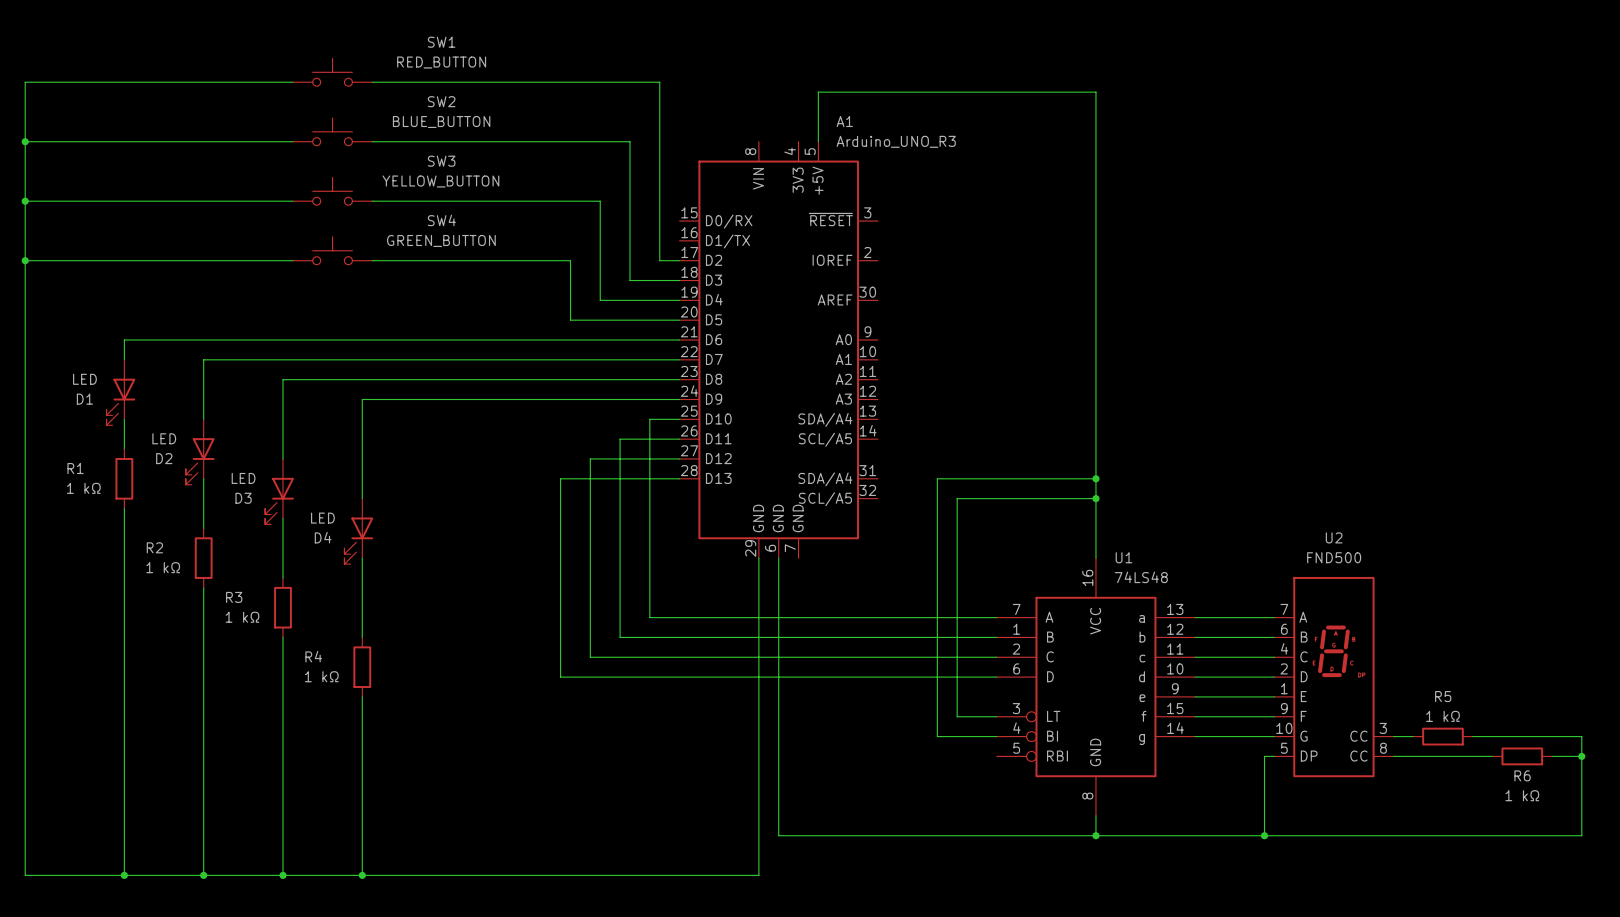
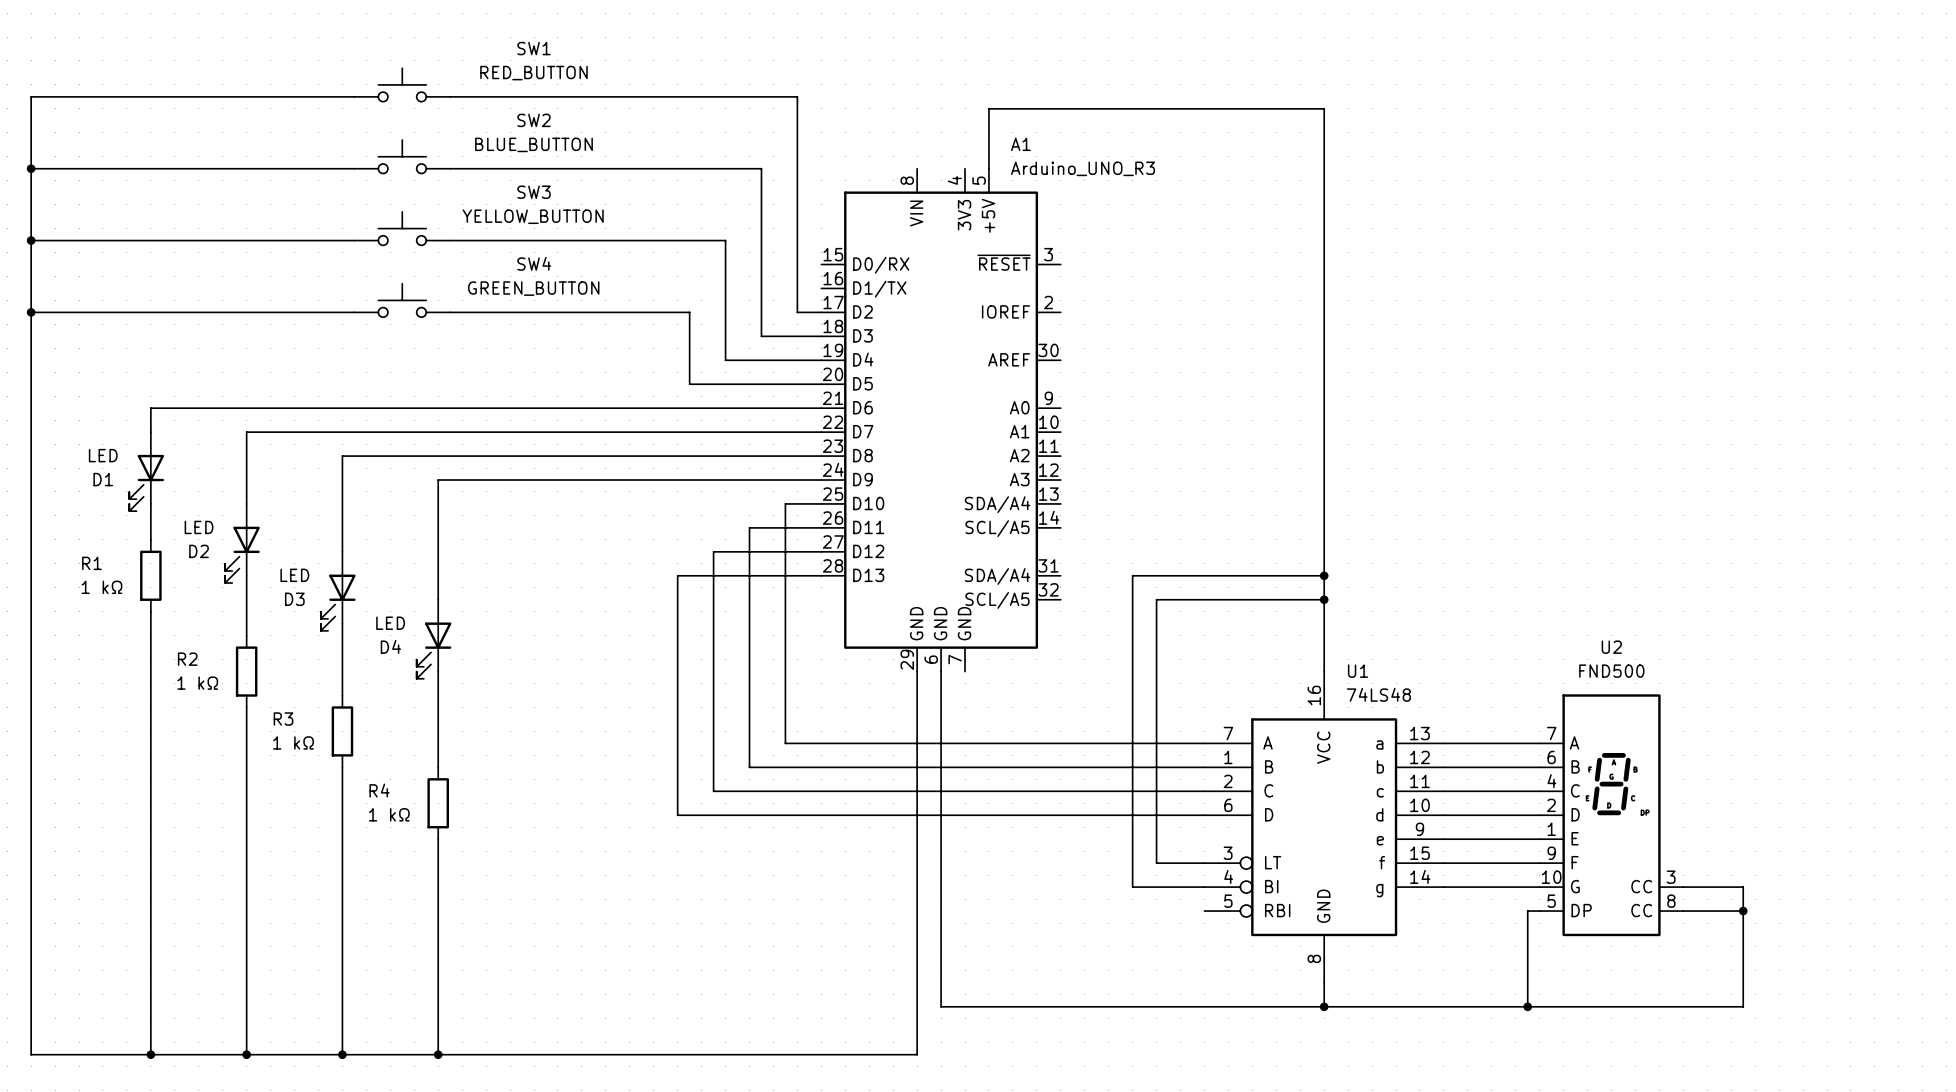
R5: 1 kΩ (1442, 736) -> none
wire: (1472, 736) (1581, 736) (1581, 835) (1442, 835) -> (1707, 887) (1743, 887) (1743, 1006)
wire: (1442, 756) (1492, 756) -> none
junction: none -> (1743, 911)
R6: 1 kΩ (1522, 756) -> none
wire: (1552, 756) (1581, 756) -> none
junction: (1581, 756) -> none

